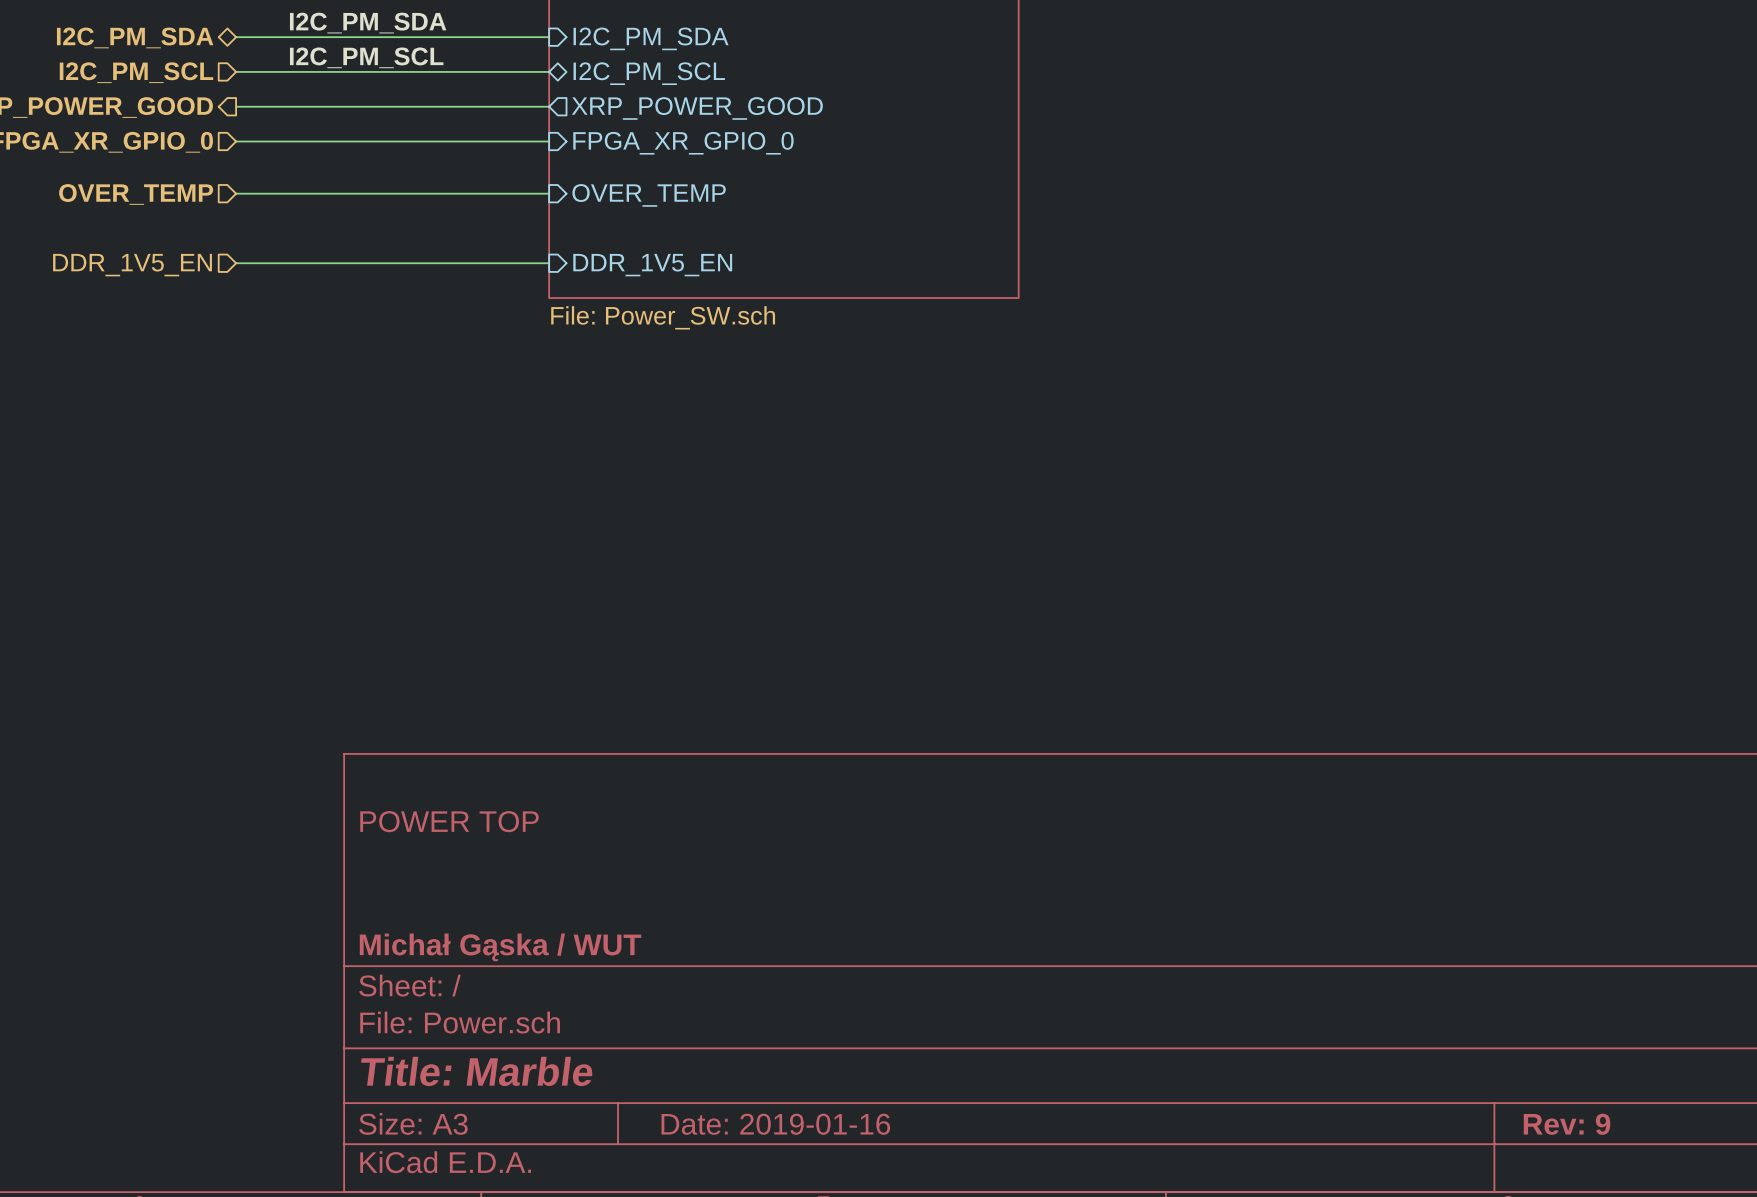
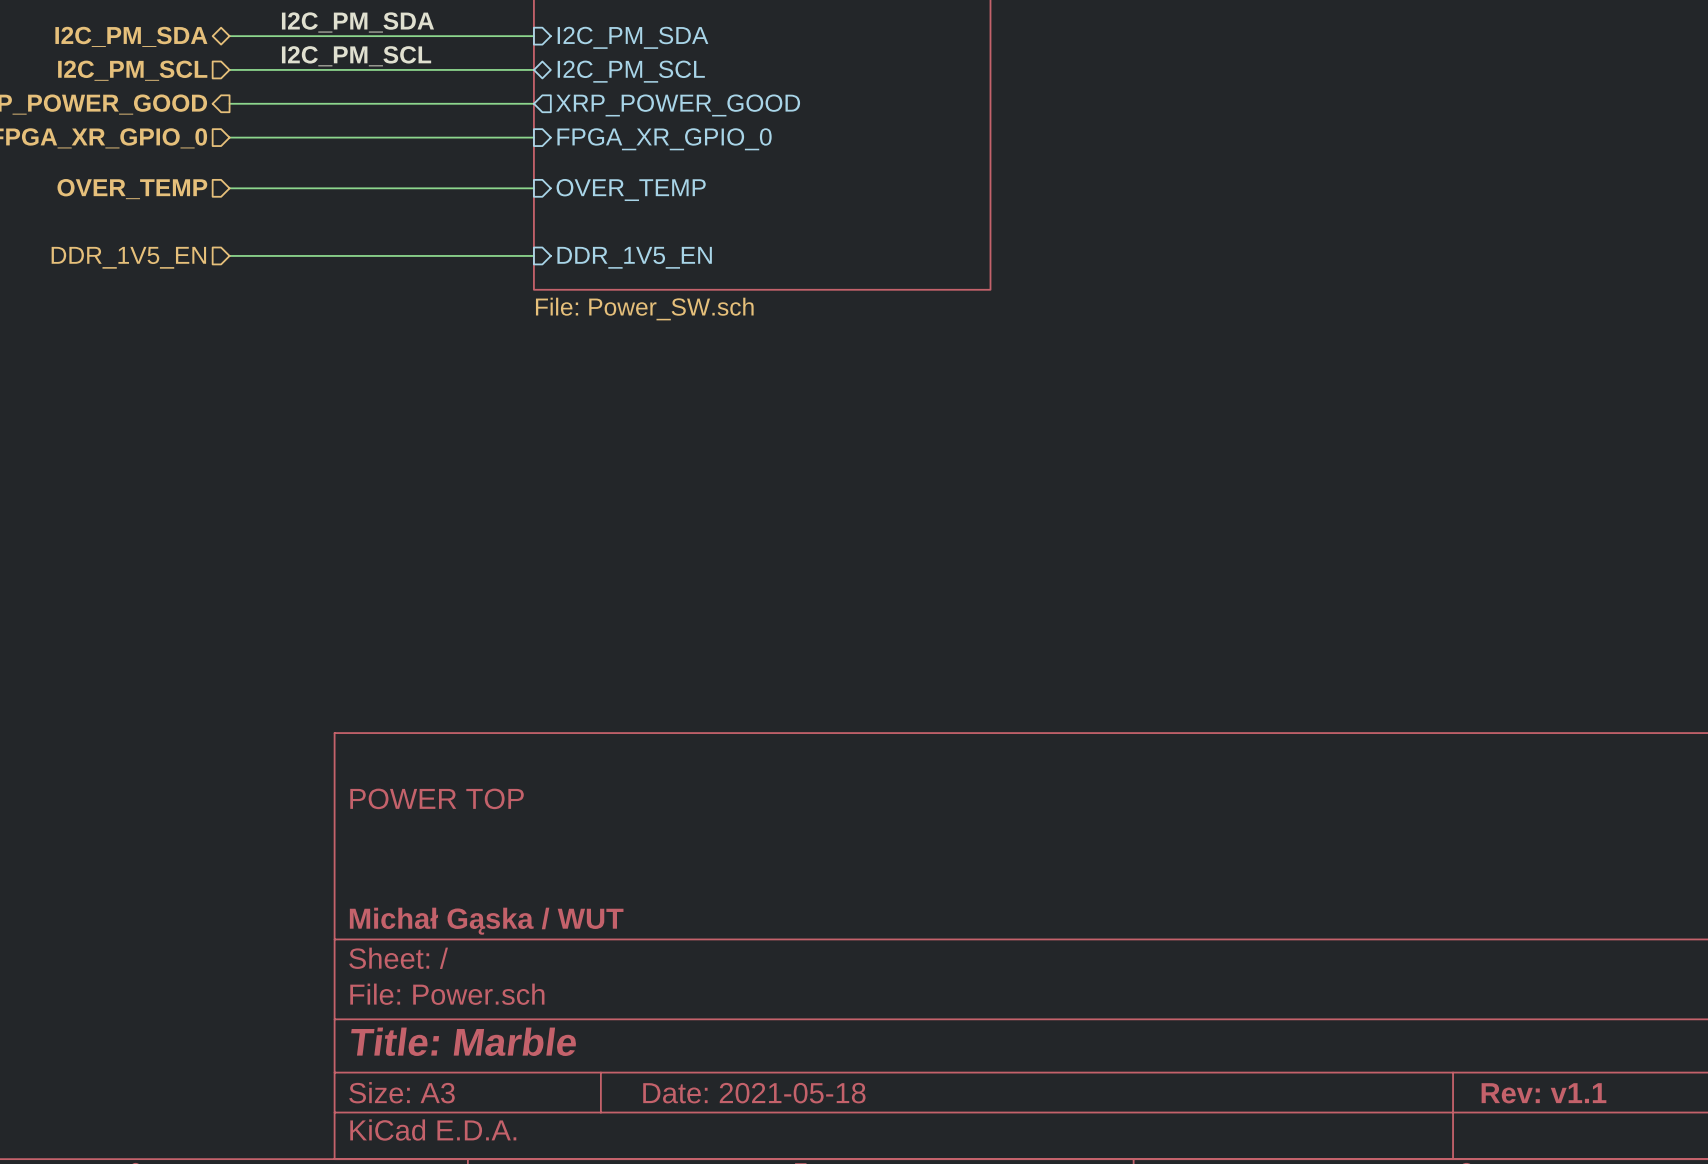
title block: Date: 2019-01-16 (775, 1124) -> Date: 2021-05-18 (754, 1093)
title block: Rev: 9 (1567, 1124) -> Rev: v1.1 (1543, 1093)

